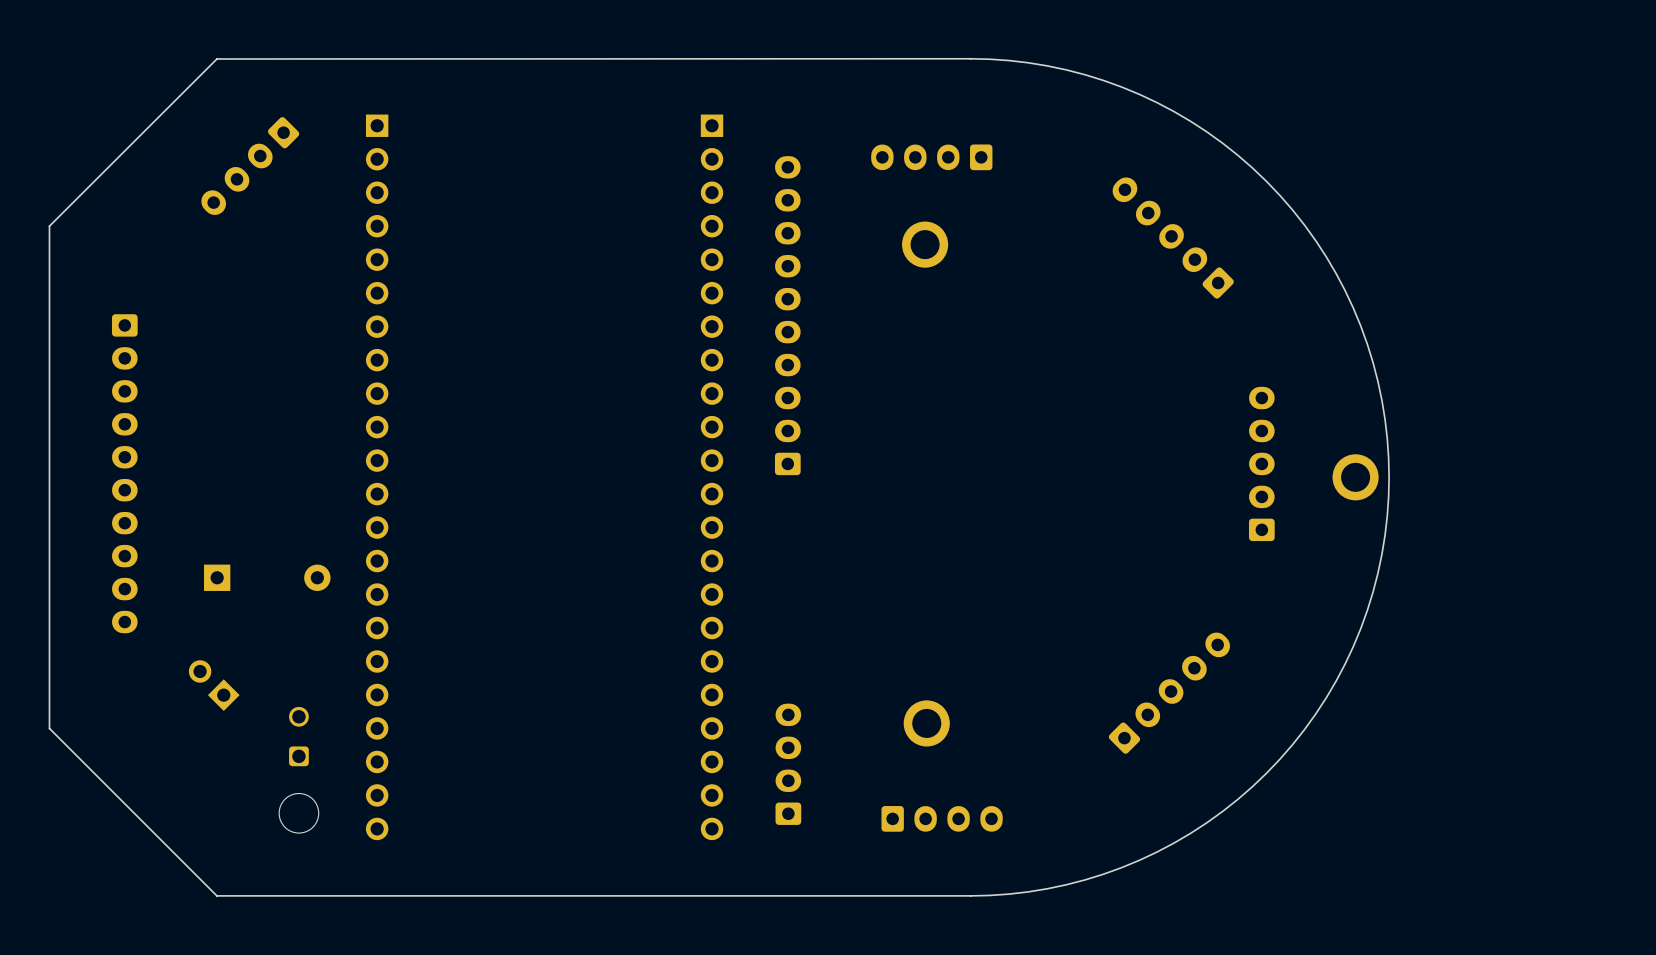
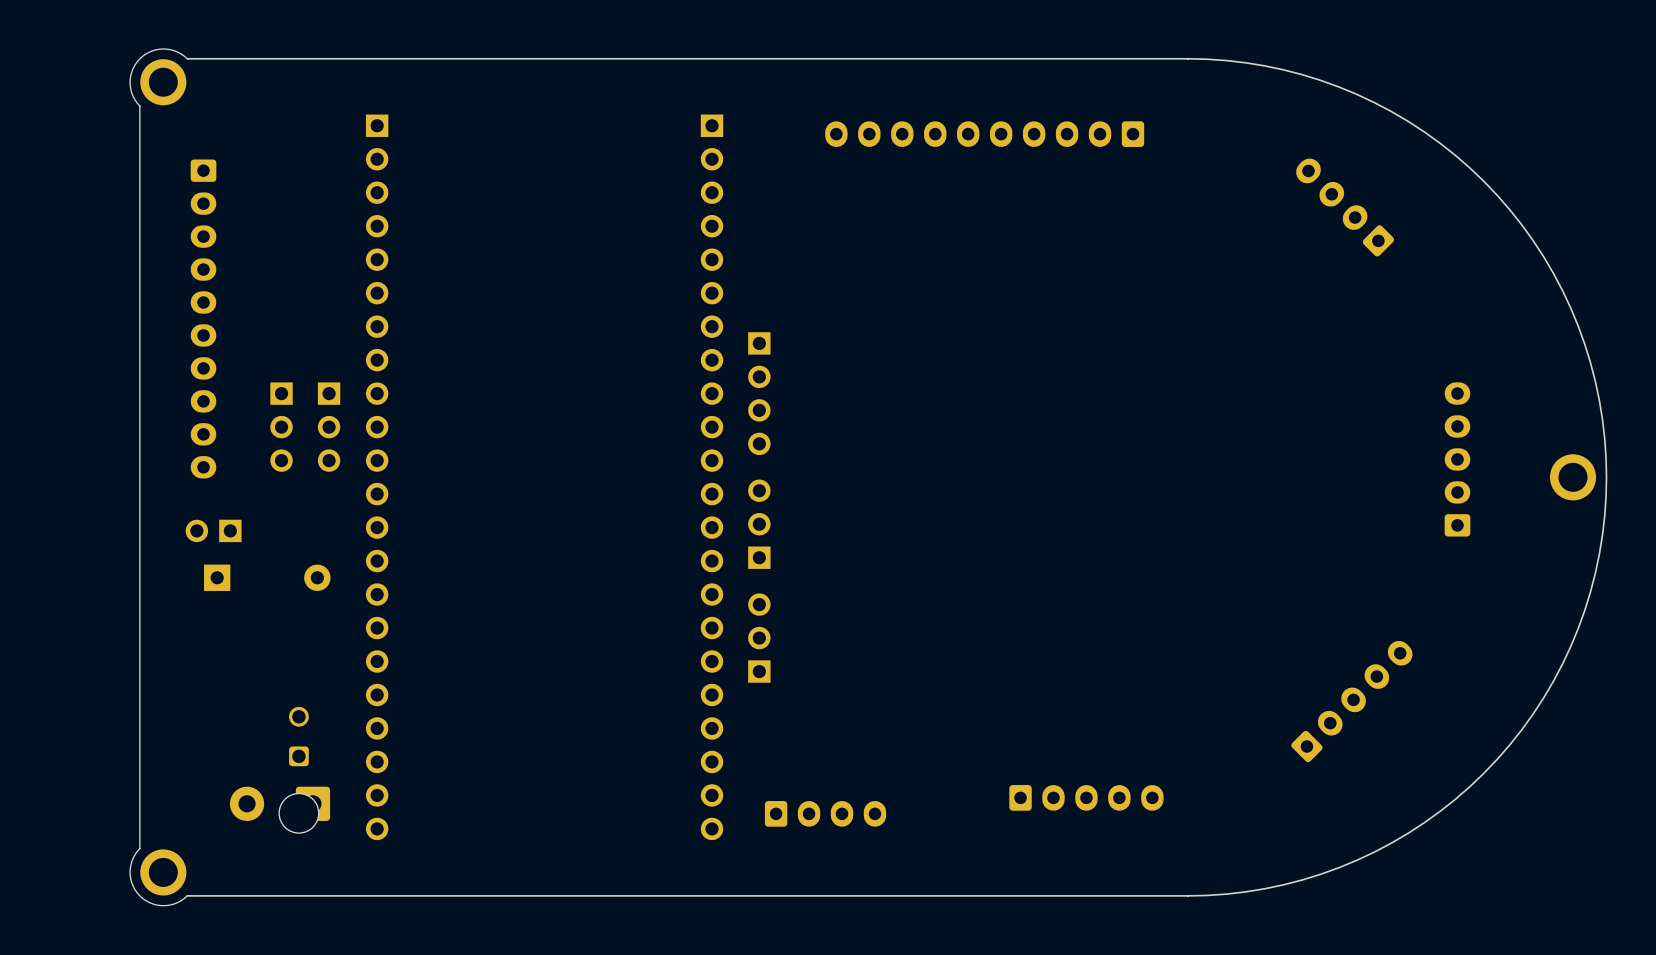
part: none -> (163, 82)
part: (931, 157) -> none
part: (250, 166) -> none
part: none -> (1345, 207)
part: (1173, 238) -> none
part: (925, 244) -> none
part rotation: 0° (787, 315) -> 90° counterclockwise (984, 134)
part position: (787, 315) -> (984, 134)
part: none -> (759, 393)
part: none -> (281, 427)
part: none -> (329, 427)
part: none -> (1457, 459)
part: (1261, 463) -> none
part position: (124, 473) -> (203, 318)
part position: (1355, 477) -> (1573, 477)
part: none -> (759, 524)
part: none -> (213, 530)
part: none -> (759, 638)
part: (214, 685) -> none
part: (1169, 693) -> none
part: none -> (1351, 701)
part: (926, 723) -> none
part: (788, 764) -> none
part: none -> (1086, 797)
part: none -> (279, 803)
part: none -> (825, 813)
part: (942, 818) -> none
part: none -> (163, 872)
board edge: (970, 895) (1009, 894) (1047, 888) (1085, 879) (1121, 867) (1174, 842) (1207, 822) (1237, 799) (1266, 773) (1292, 744) (1315, 713) (1345, 663) (1360, 628) (1373, 591) (1381, 554) (1387, 515) (1389, 477) (1387, 438) (1381, 400) (1373, 362) (1360, 326) (1345, 290) (1326, 256) (1304, 225) (1266, 181) (1237, 155) (1207, 132) (1174, 111) (1139, 94) (1103, 80) (1066, 69) (1028, 62) (970, 58) (216, 59) (49, 226) (49, 728) (216, 895) -> (970, 895) (1187, 895) (1226, 894) (1283, 884) (1339, 867) (1374, 852) (1408, 833) (1440, 811) (1469, 786) (1497, 759) (1521, 729) (1543, 697) (1562, 663) (1578, 628) (1595, 573) (1602, 535) (1606, 496) (1606, 458) (1602, 419) (1595, 381) (1584, 344) (1570, 308) (1553, 273) (1533, 240) (1509, 209) (1483, 181) (1455, 155) (1408, 121) (1374, 102) (1339, 87) (1302, 74) (1264, 65) (1207, 59) (187, 58) (176, 51) (163, 48) (150, 51) (143, 55) (134, 65) (130, 82) (132, 95) (139, 106) (139, 848) (131, 862) (130, 874) (137, 892) (153, 904) (173, 904) (187, 895) (216, 895)

